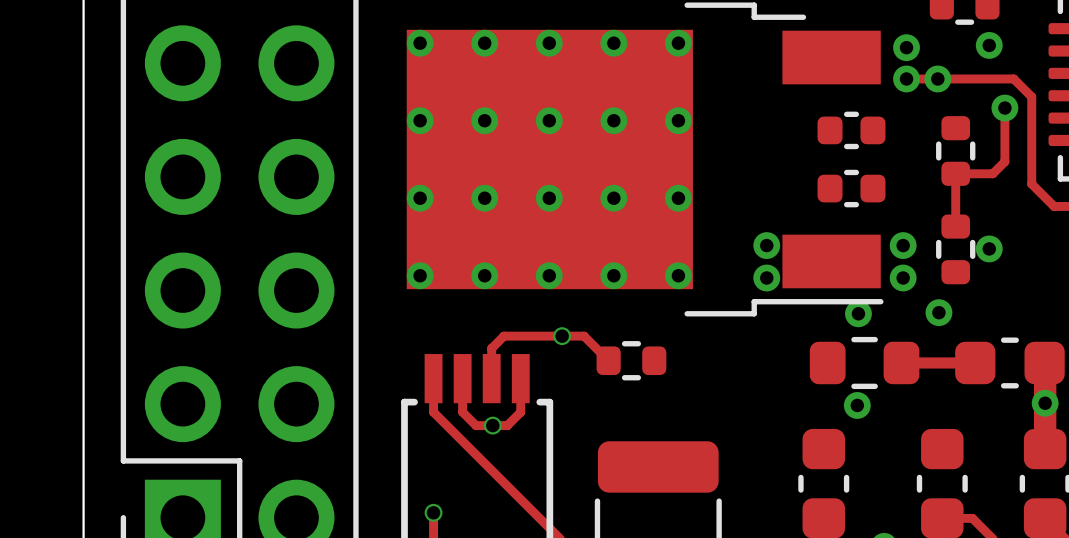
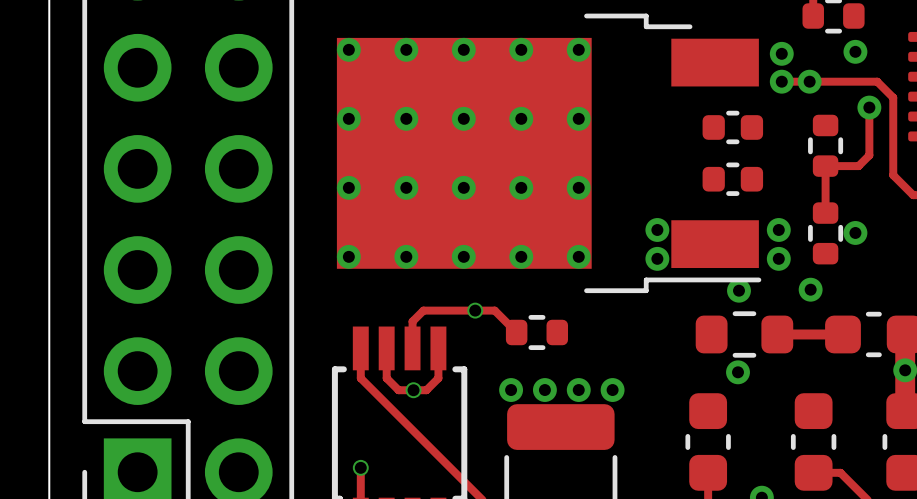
via: none -> (511, 390)
via: none -> (544, 390)
via: none -> (578, 390)
via: none -> (612, 390)

